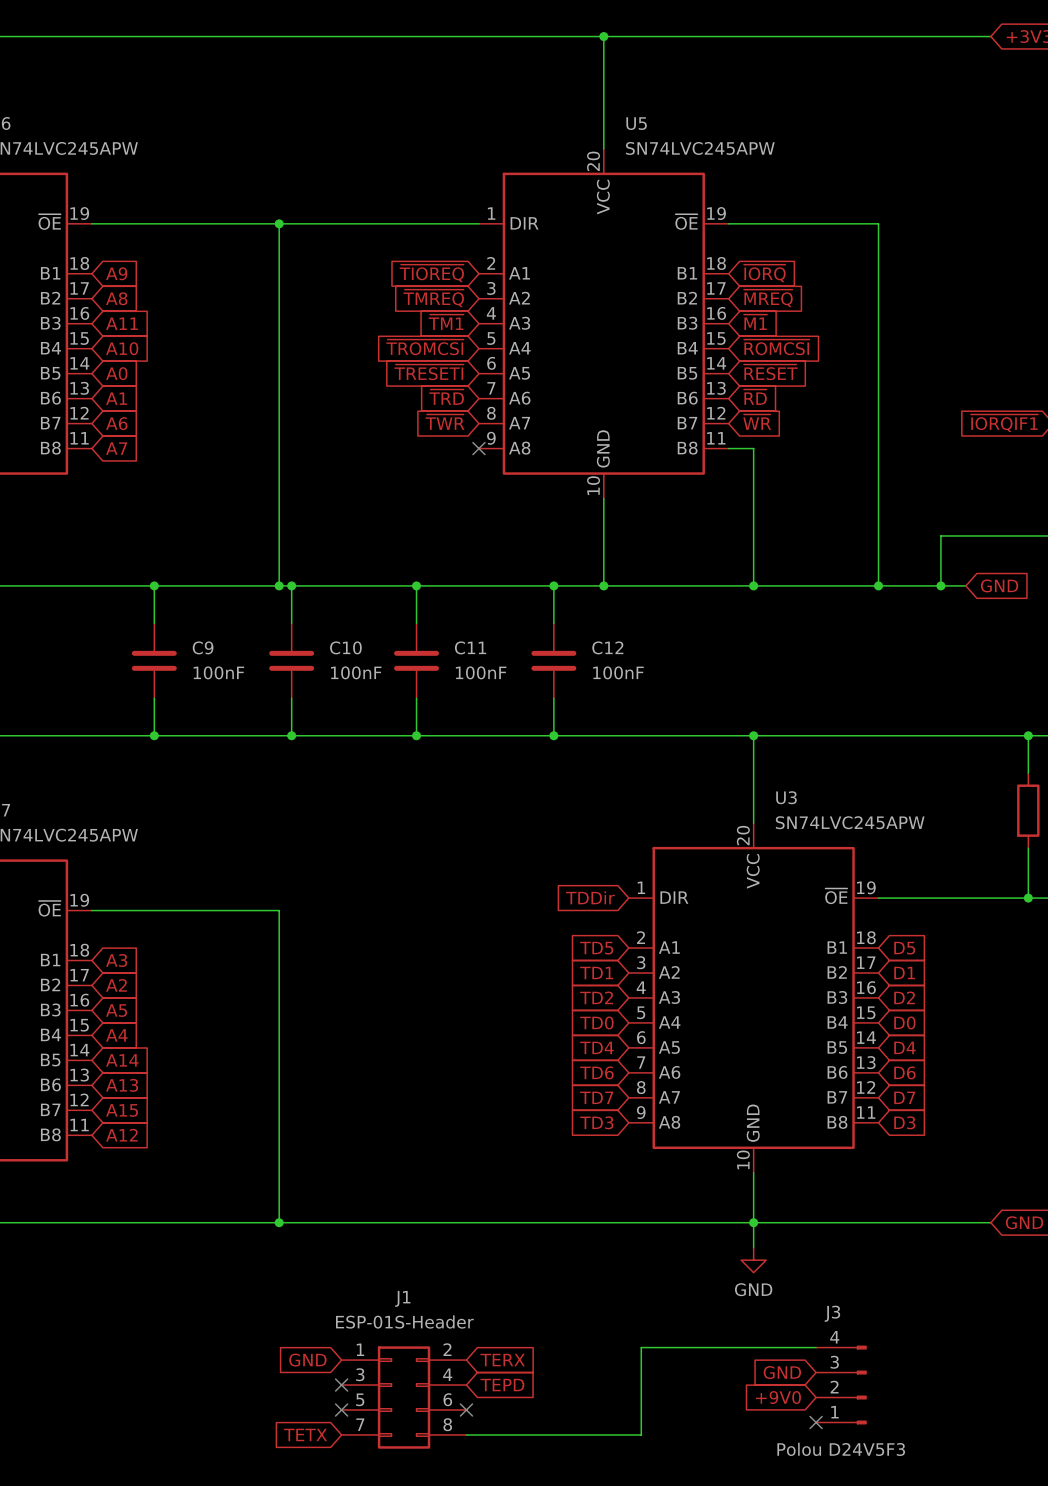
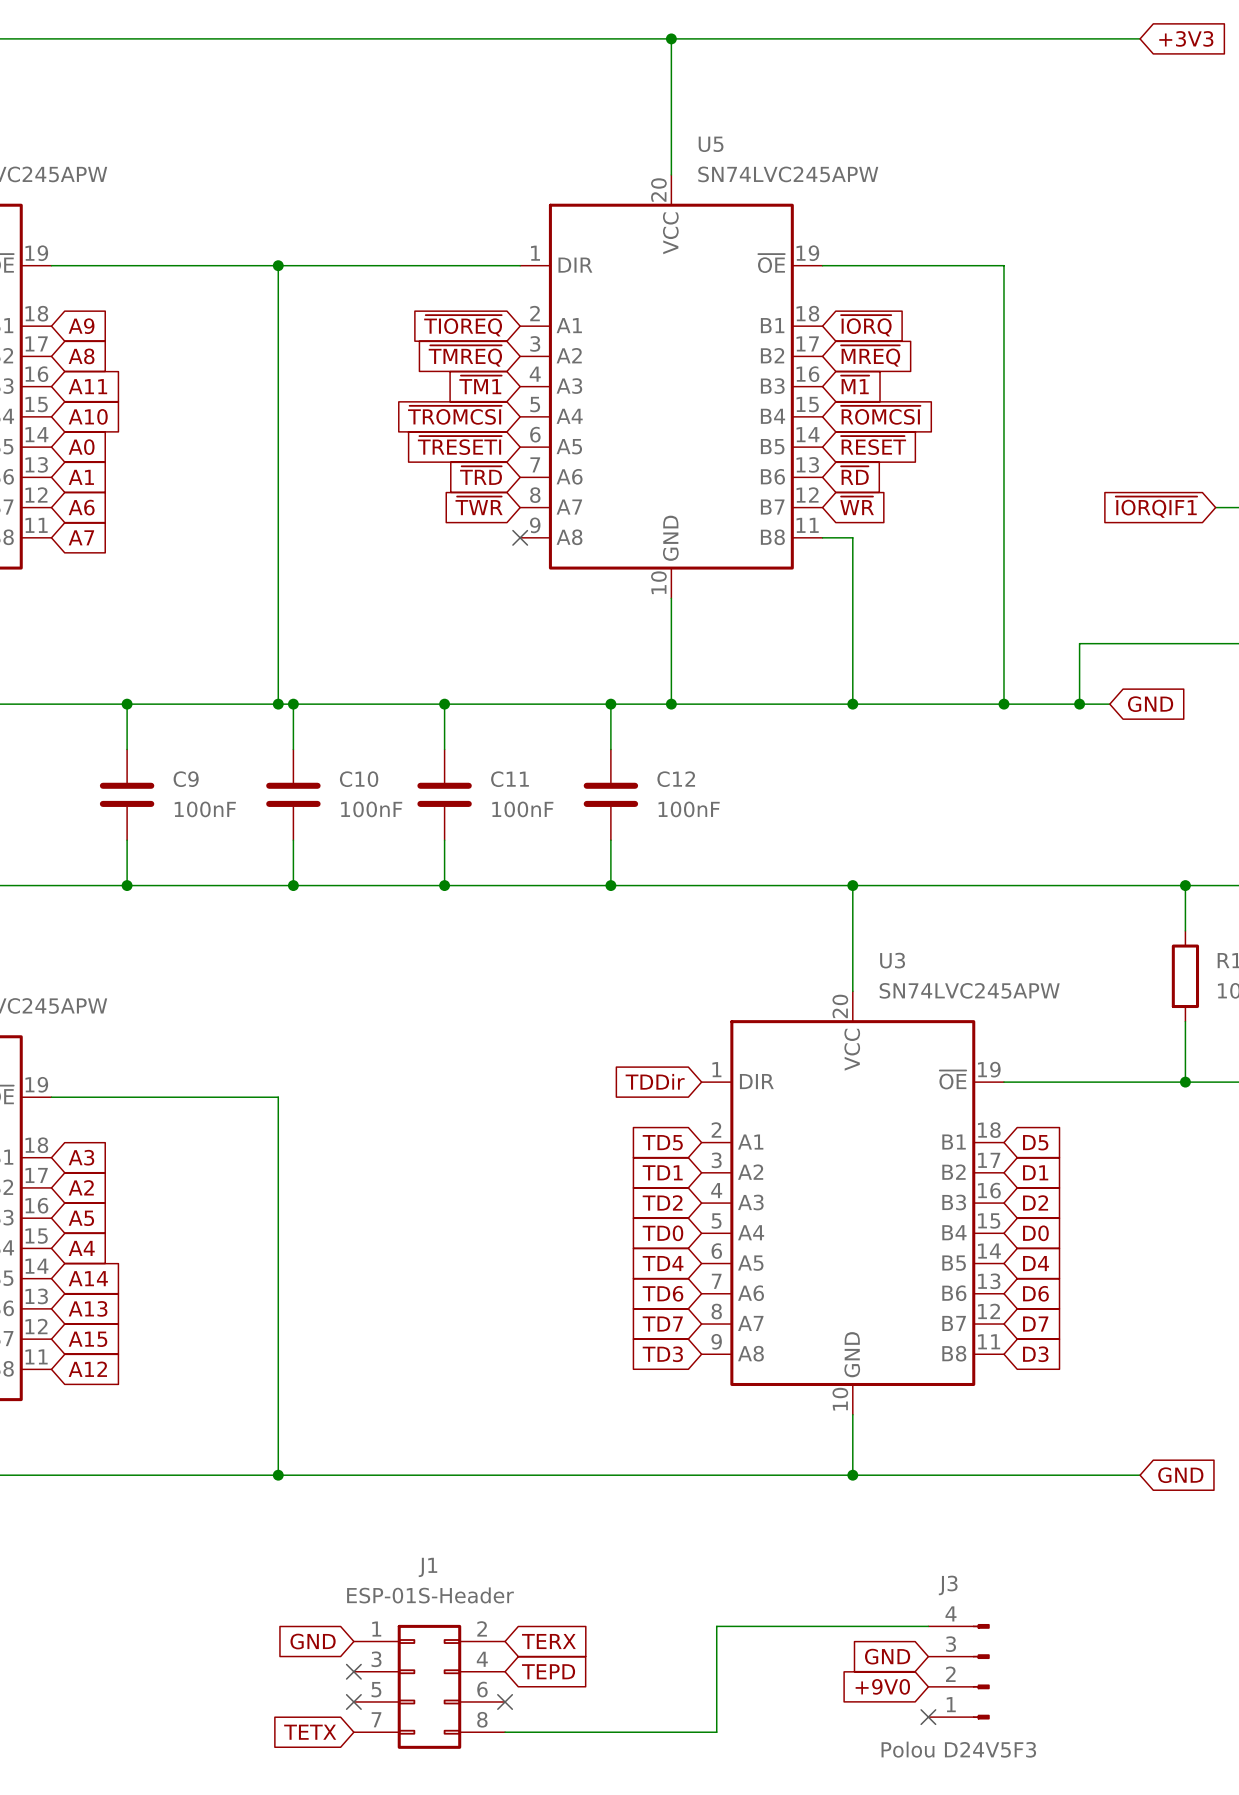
wire: (753, 1222) (753, 1247) -> none
power symbol: GND (753, 1260) -> none

